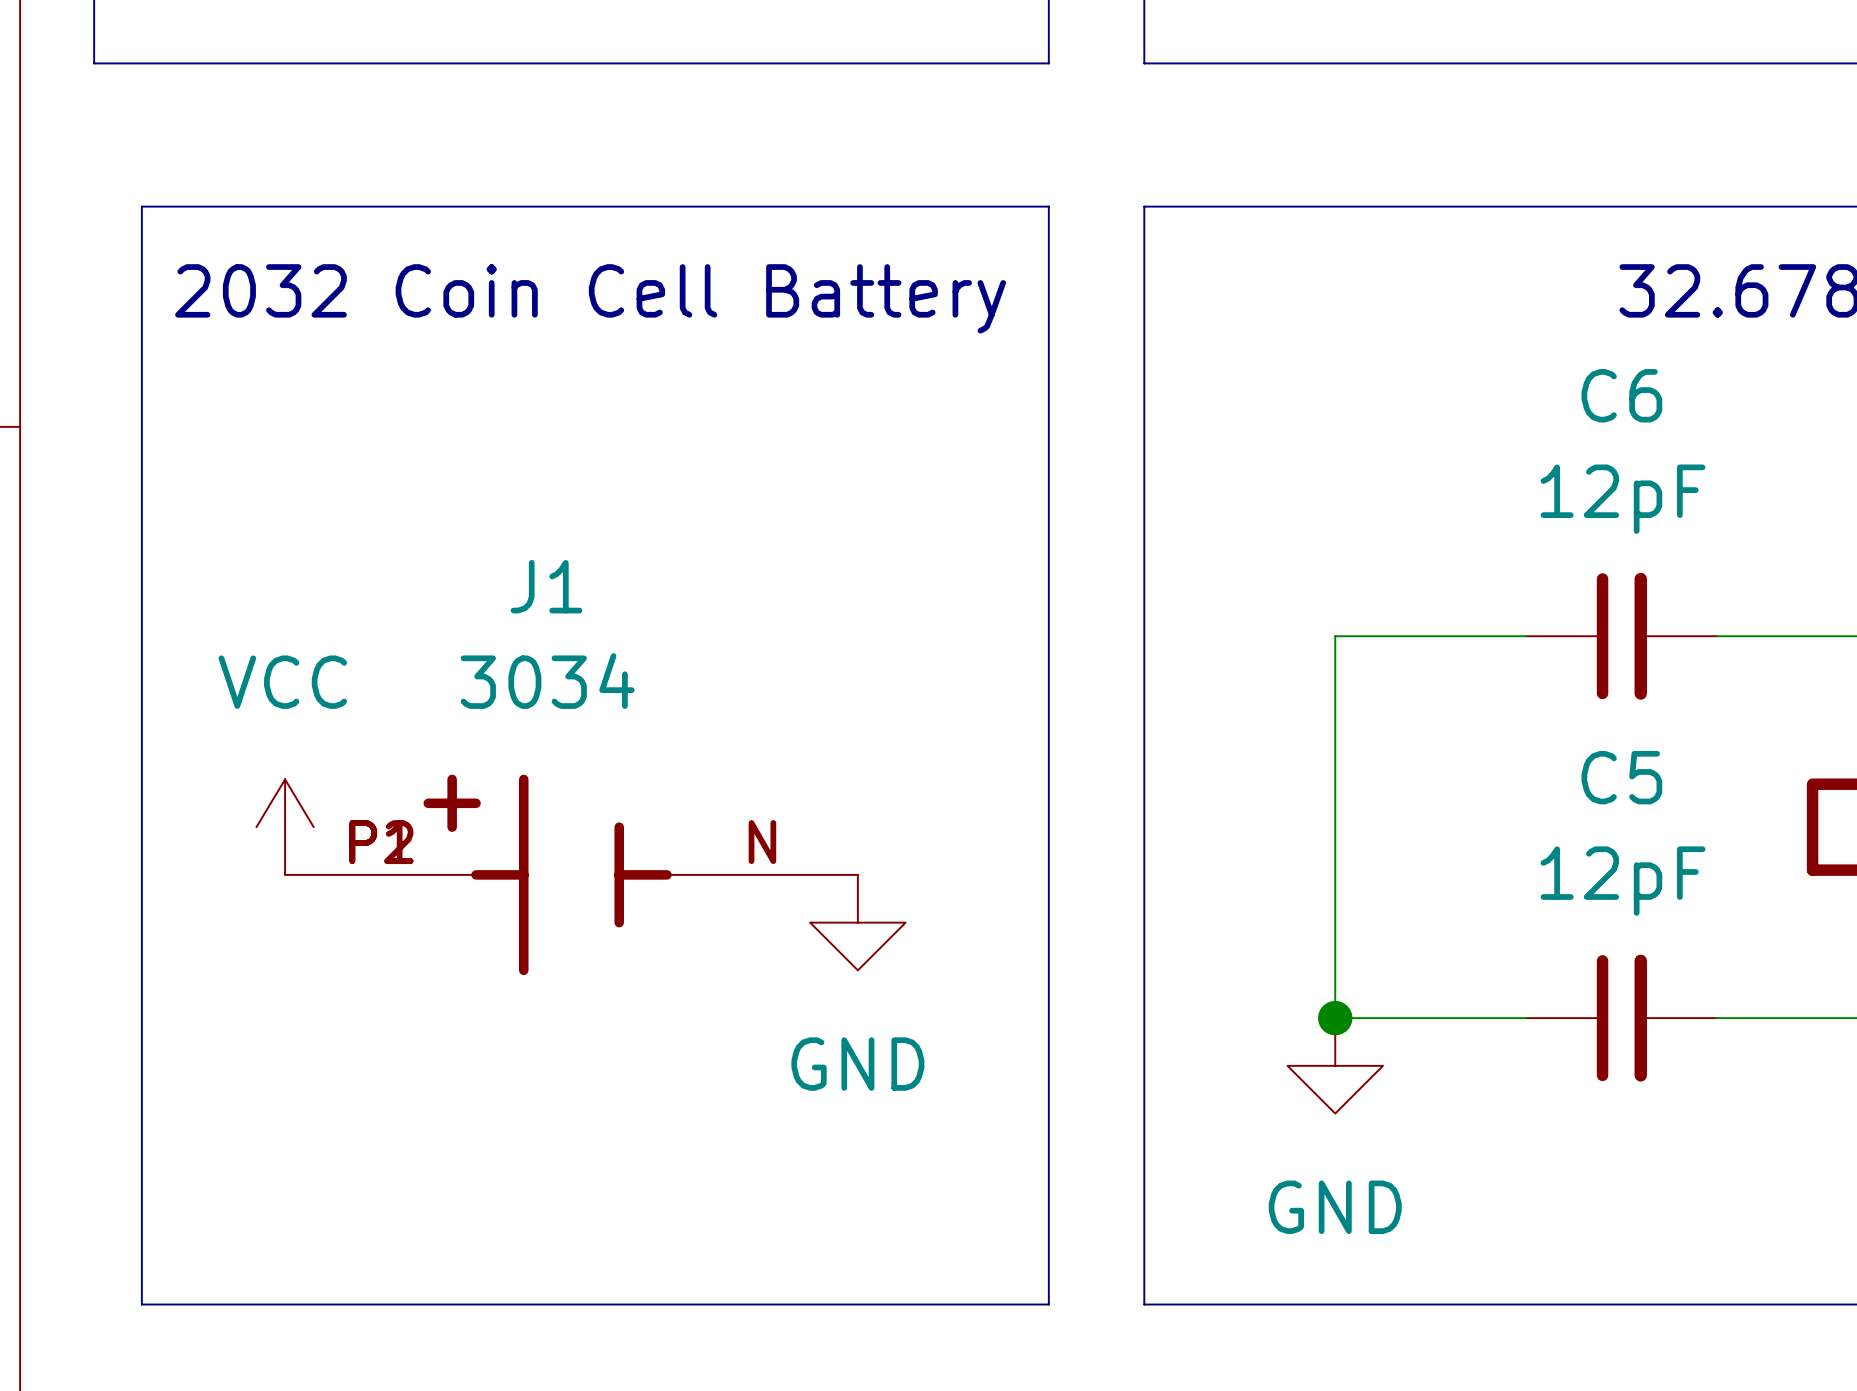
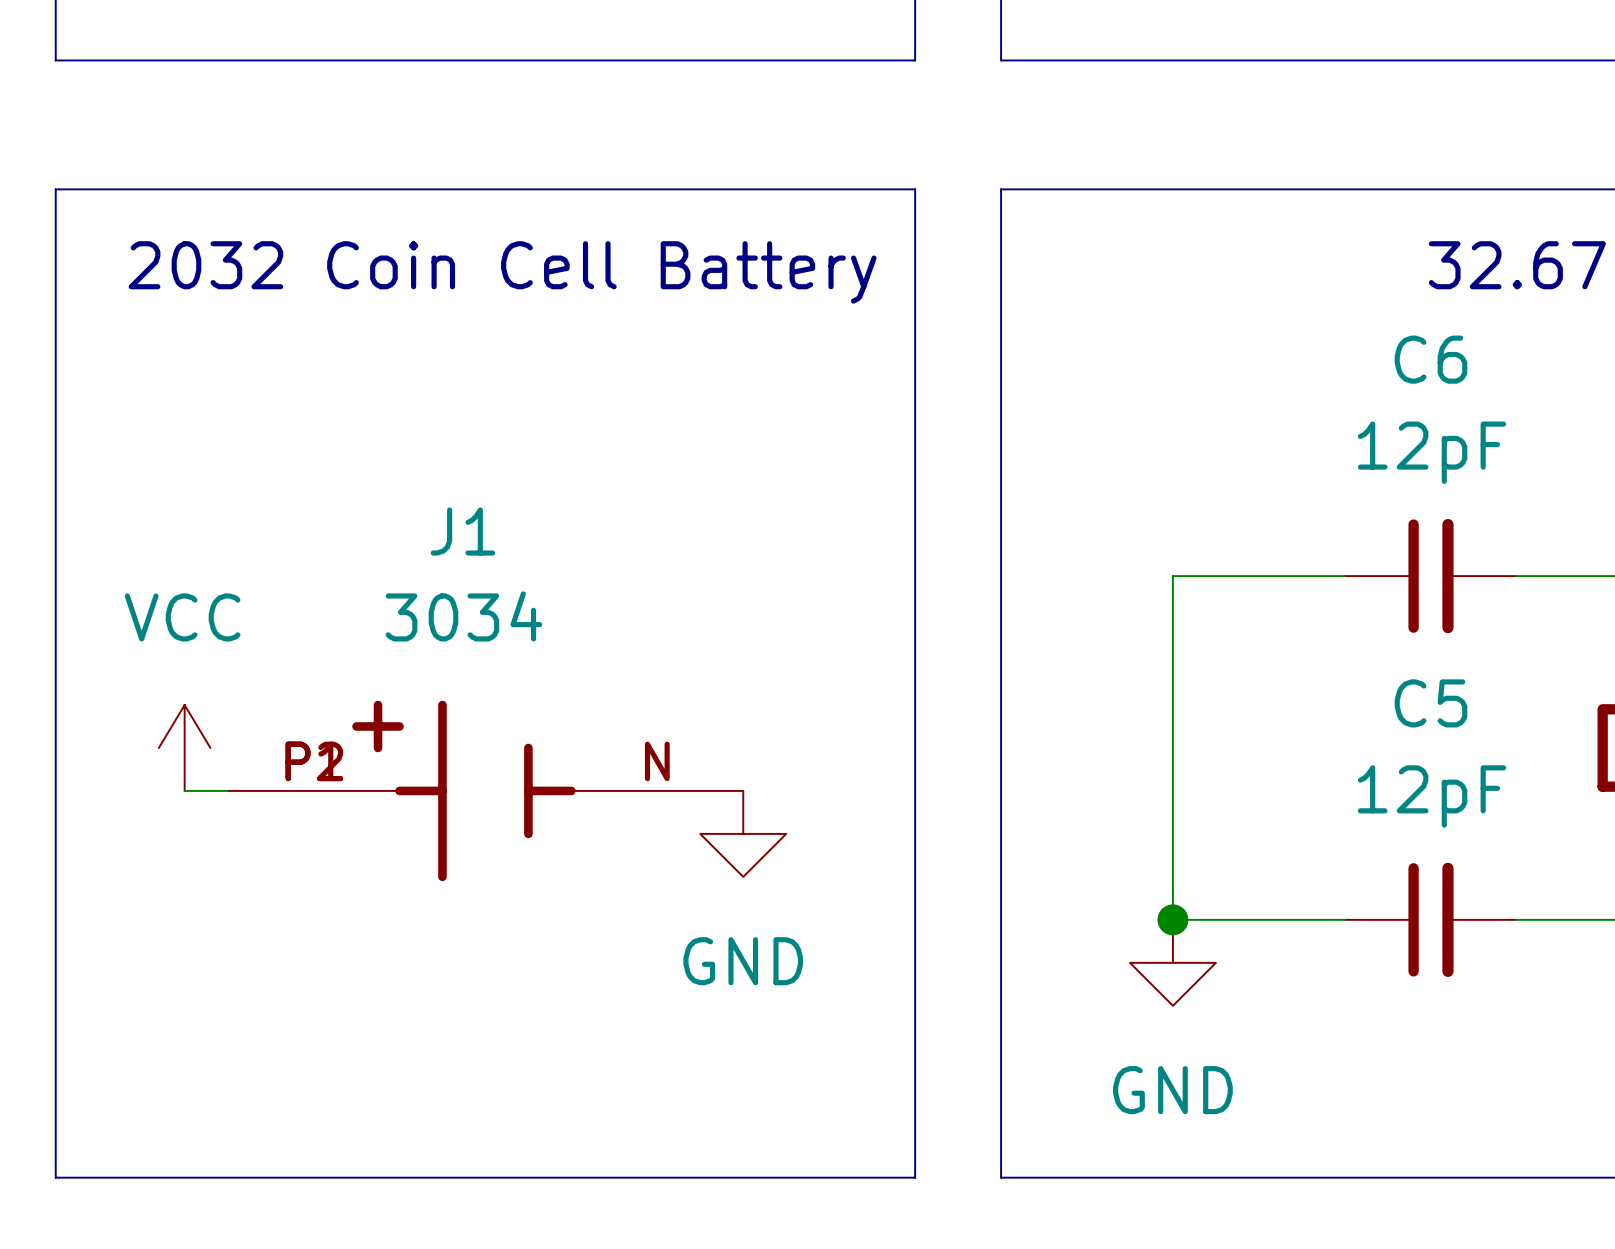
line: (141, 206) (141, 1304) -> (98, 189) (55, 189) (55, 1177) (98, 1177)
power symbol position: VCC (285, 827) -> VCC (184, 747)
wire: none -> (184, 790) (227, 790)

